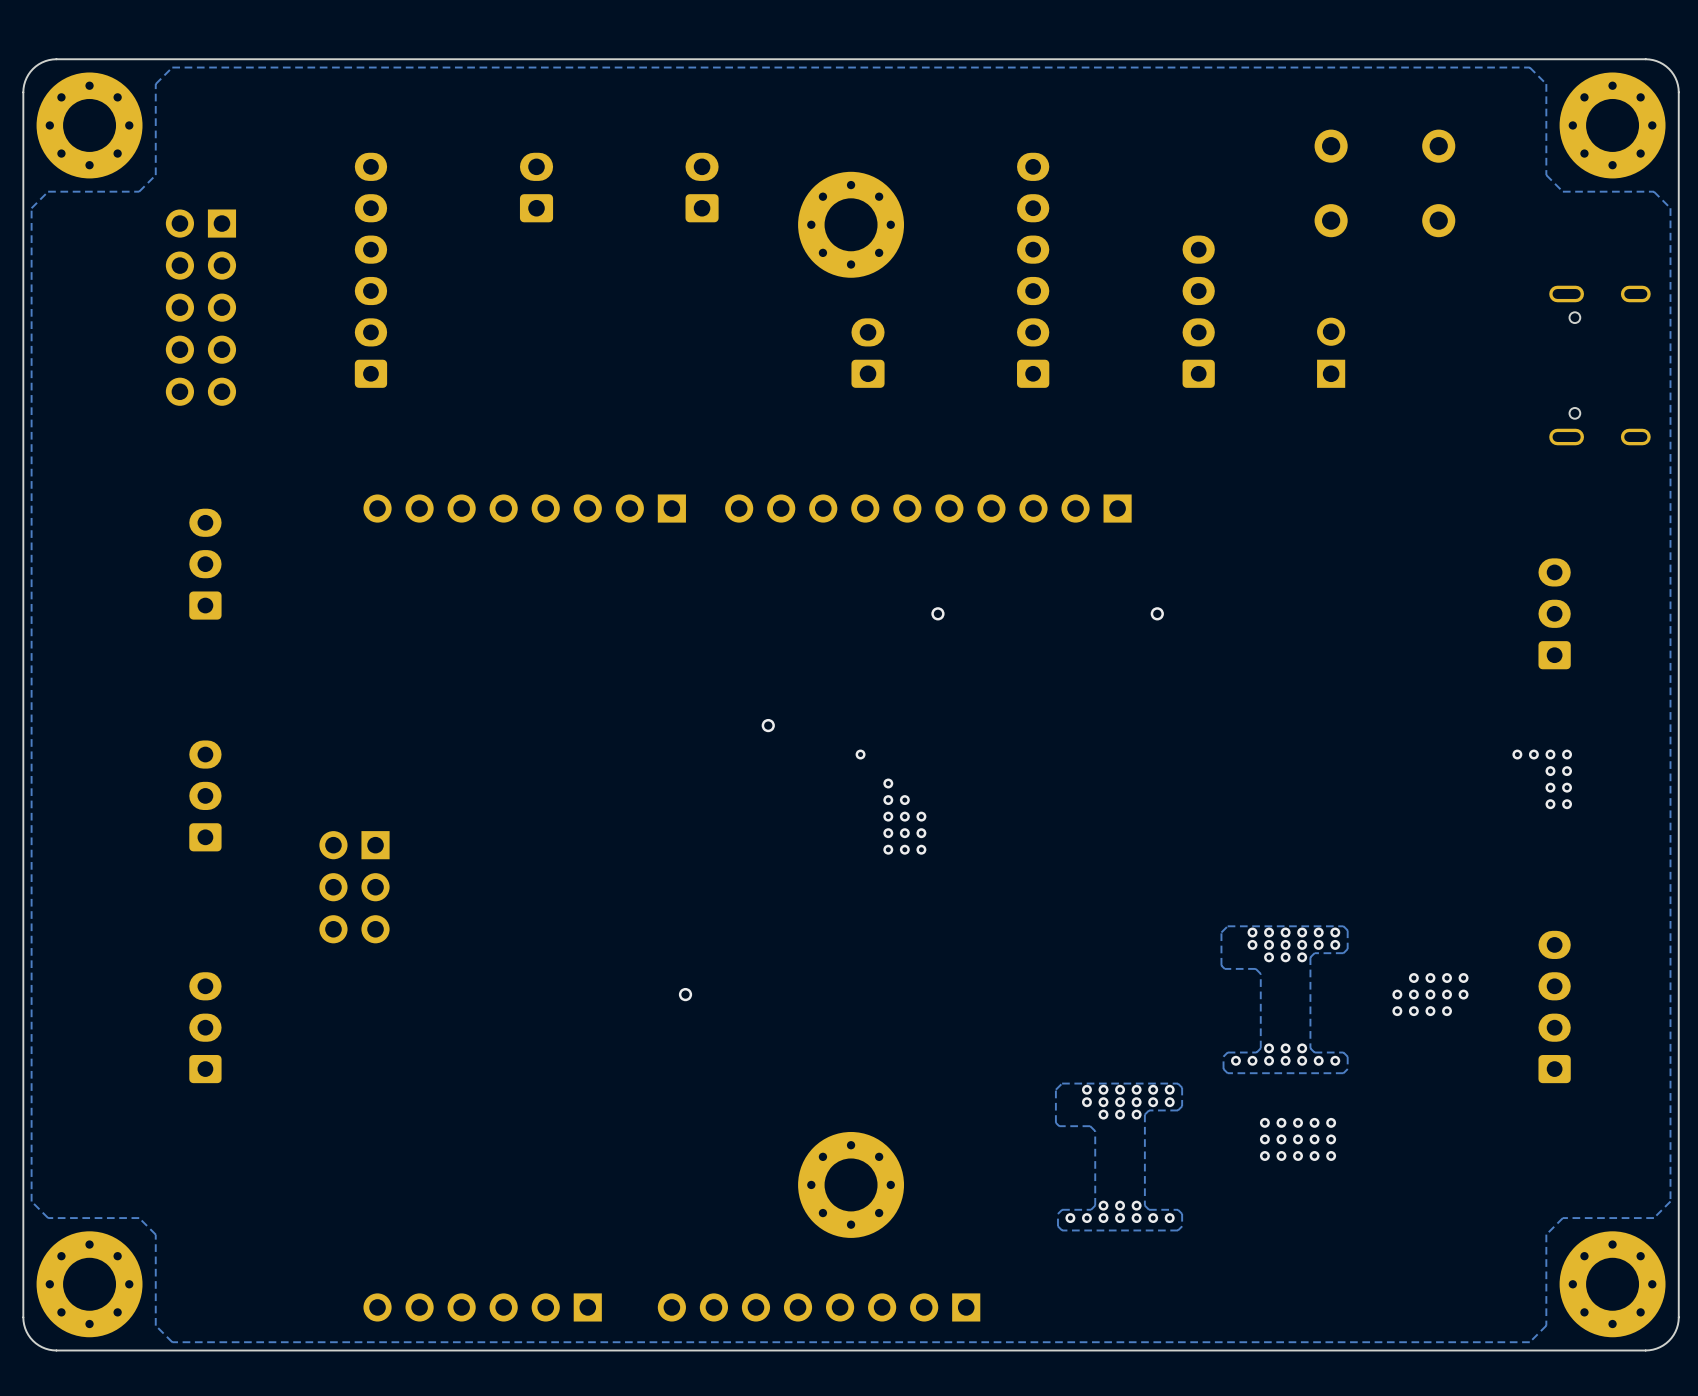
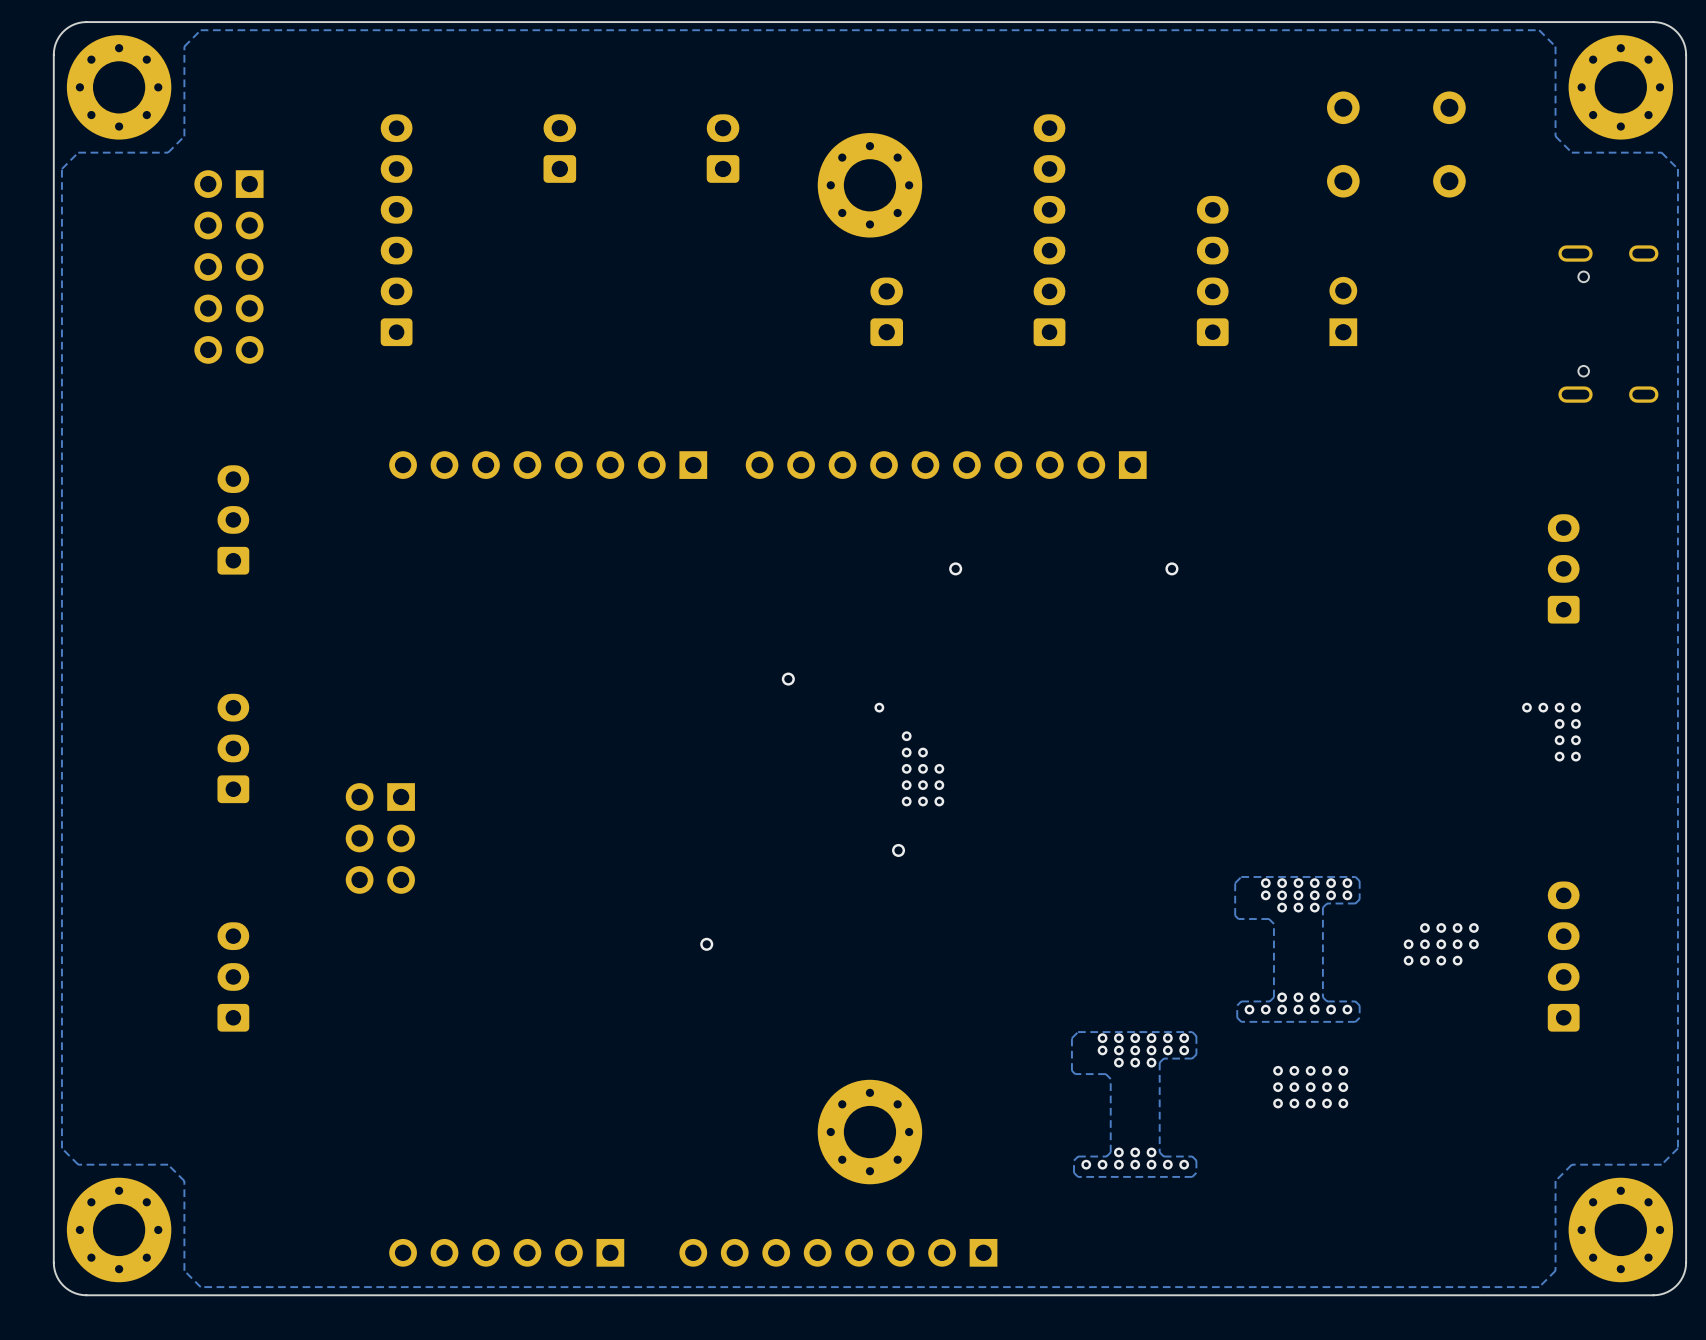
via: none -> (898, 850)

